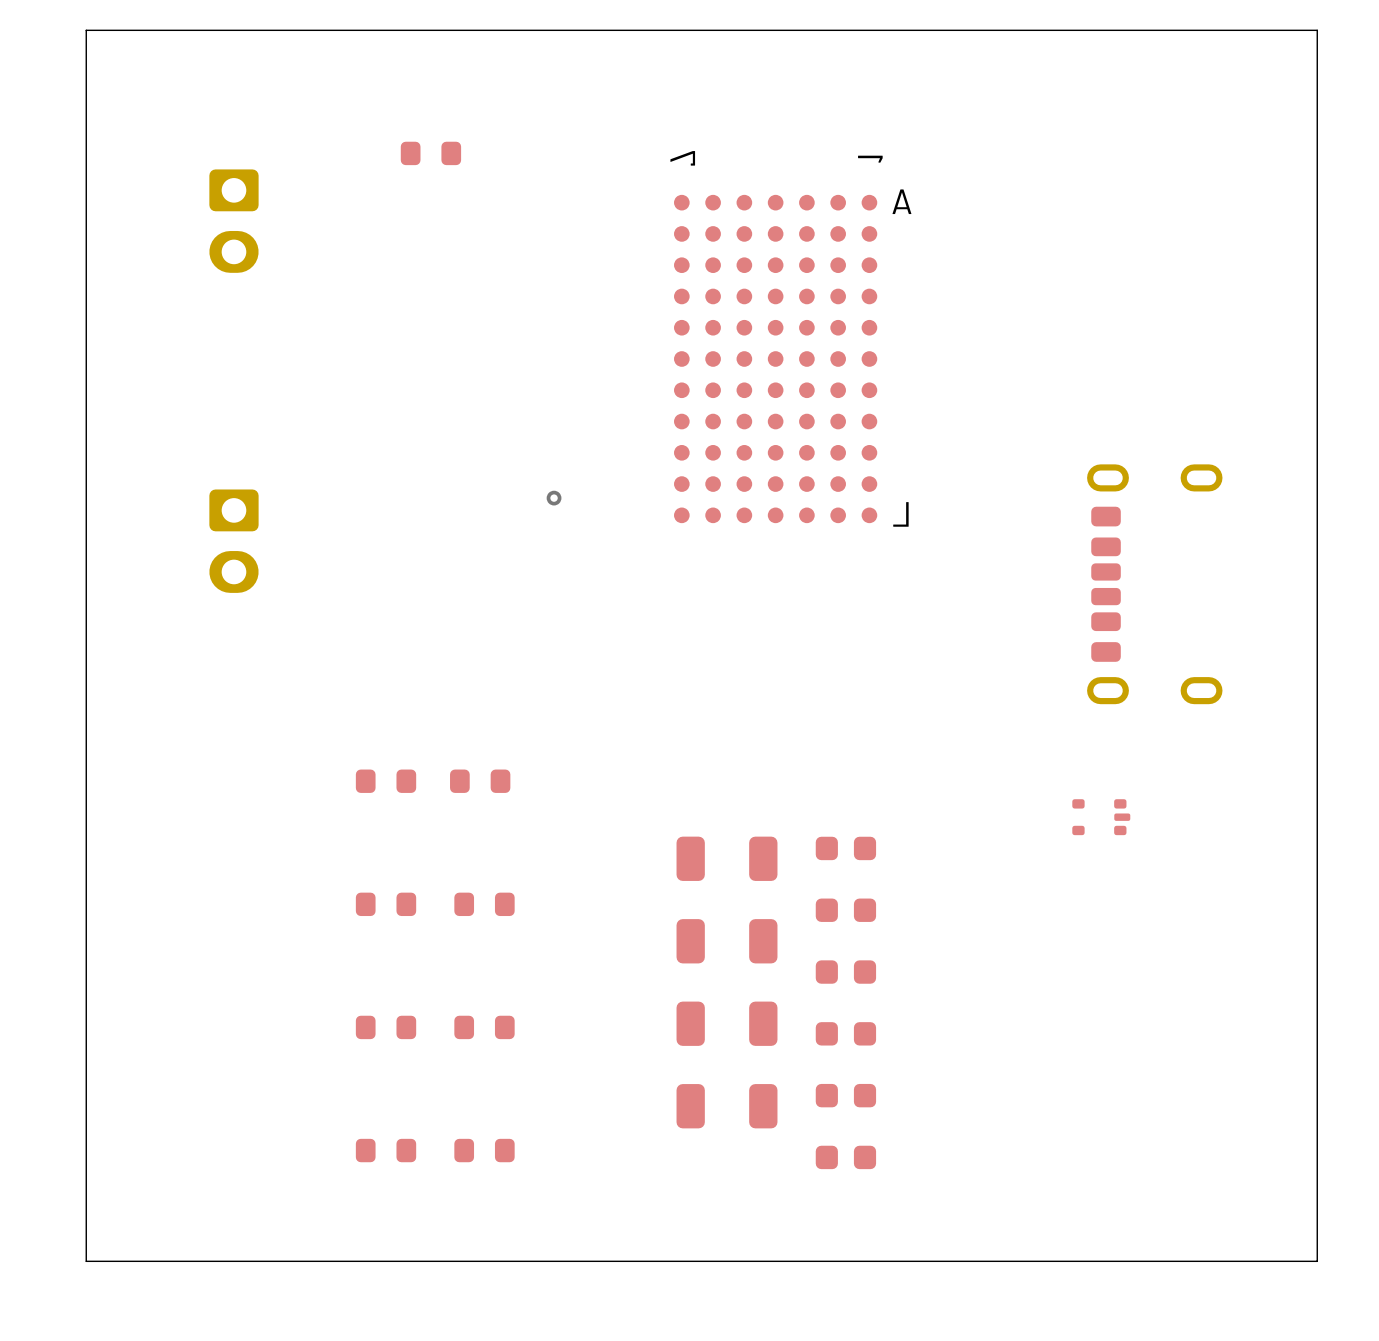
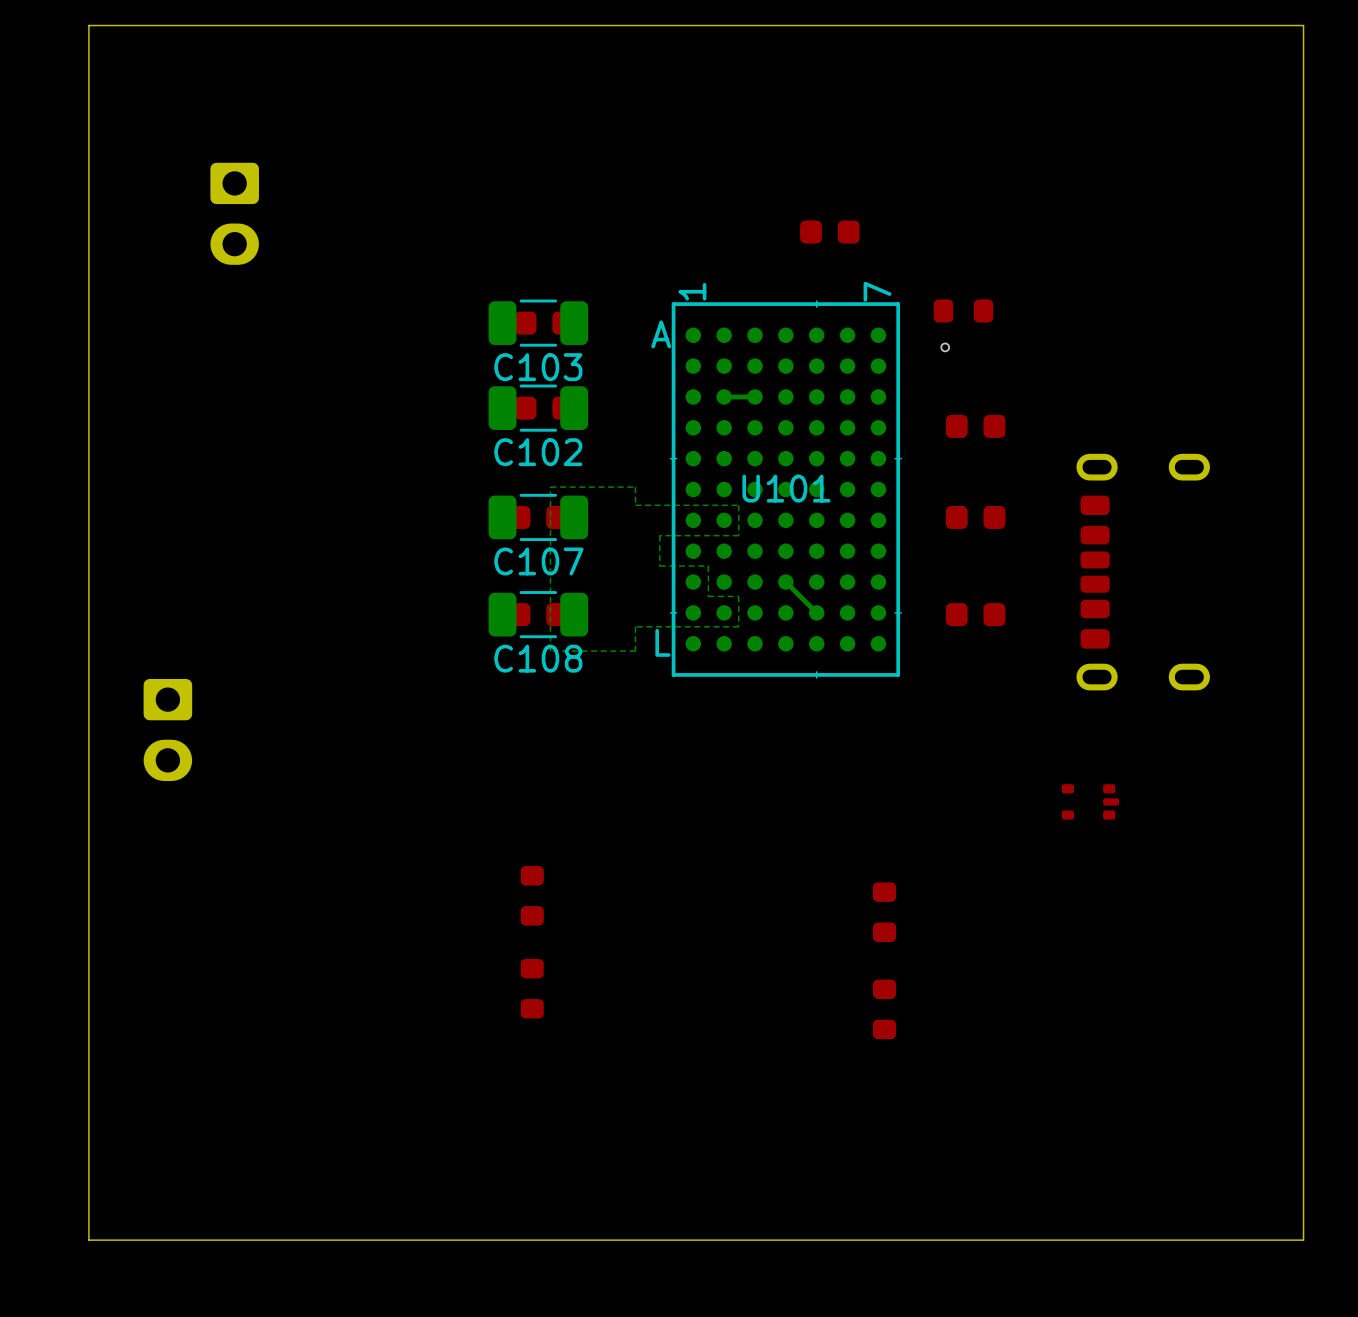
part: (430, 153) -> none
part: none -> (829, 232)
part: none -> (963, 310)
C103: none -> (538, 323)
part: none -> (544, 323)
via: none -> (945, 347)
U101 side: top (775, 359) -> bottom (785, 489)
bottom track: none -> (755, 396) (724, 396)
part: none -> (544, 408)
part: none -> (975, 426)
via: (554, 498) -> none
bottom zone outline: none -> (635, 487) (635, 505) (738, 505) (738, 535) (659, 535) (659, 566) (708, 566) (708, 596) (738, 596) (738, 626) (635, 626) (635, 651) (550, 651) (550, 487) (635, 487)
part: none -> (538, 517)
part: none -> (975, 517)
part position: (233, 541) -> (167, 730)
bottom track: none -> (785, 582) (816, 612)
part: none -> (538, 614)
part: none -> (975, 614)
part: (386, 781) -> none
part: (480, 781) -> none
part: (845, 848) -> none
C102 side: top (727, 858) -> bottom (538, 408)
part: (386, 904) -> none
part rotation: 0° (484, 904) -> 90° clockwise (532, 895)
part position: (484, 904) -> (532, 895)
part: (845, 910) -> none
part: none -> (884, 912)
part: (727, 941) -> none
part: (845, 972) -> none
C107 side: top (727, 1023) -> bottom (538, 517)
part: (386, 1027) -> none
part rotation: 0° (484, 1027) -> 90° clockwise (532, 988)
part position: (484, 1027) -> (532, 988)
part: none -> (884, 1009)
part: (845, 1033) -> none
part: (845, 1095) -> none
C108 side: top (727, 1106) -> bottom (538, 614)
part: (386, 1150) -> none
part: (484, 1150) -> none
part: (845, 1157) -> none

